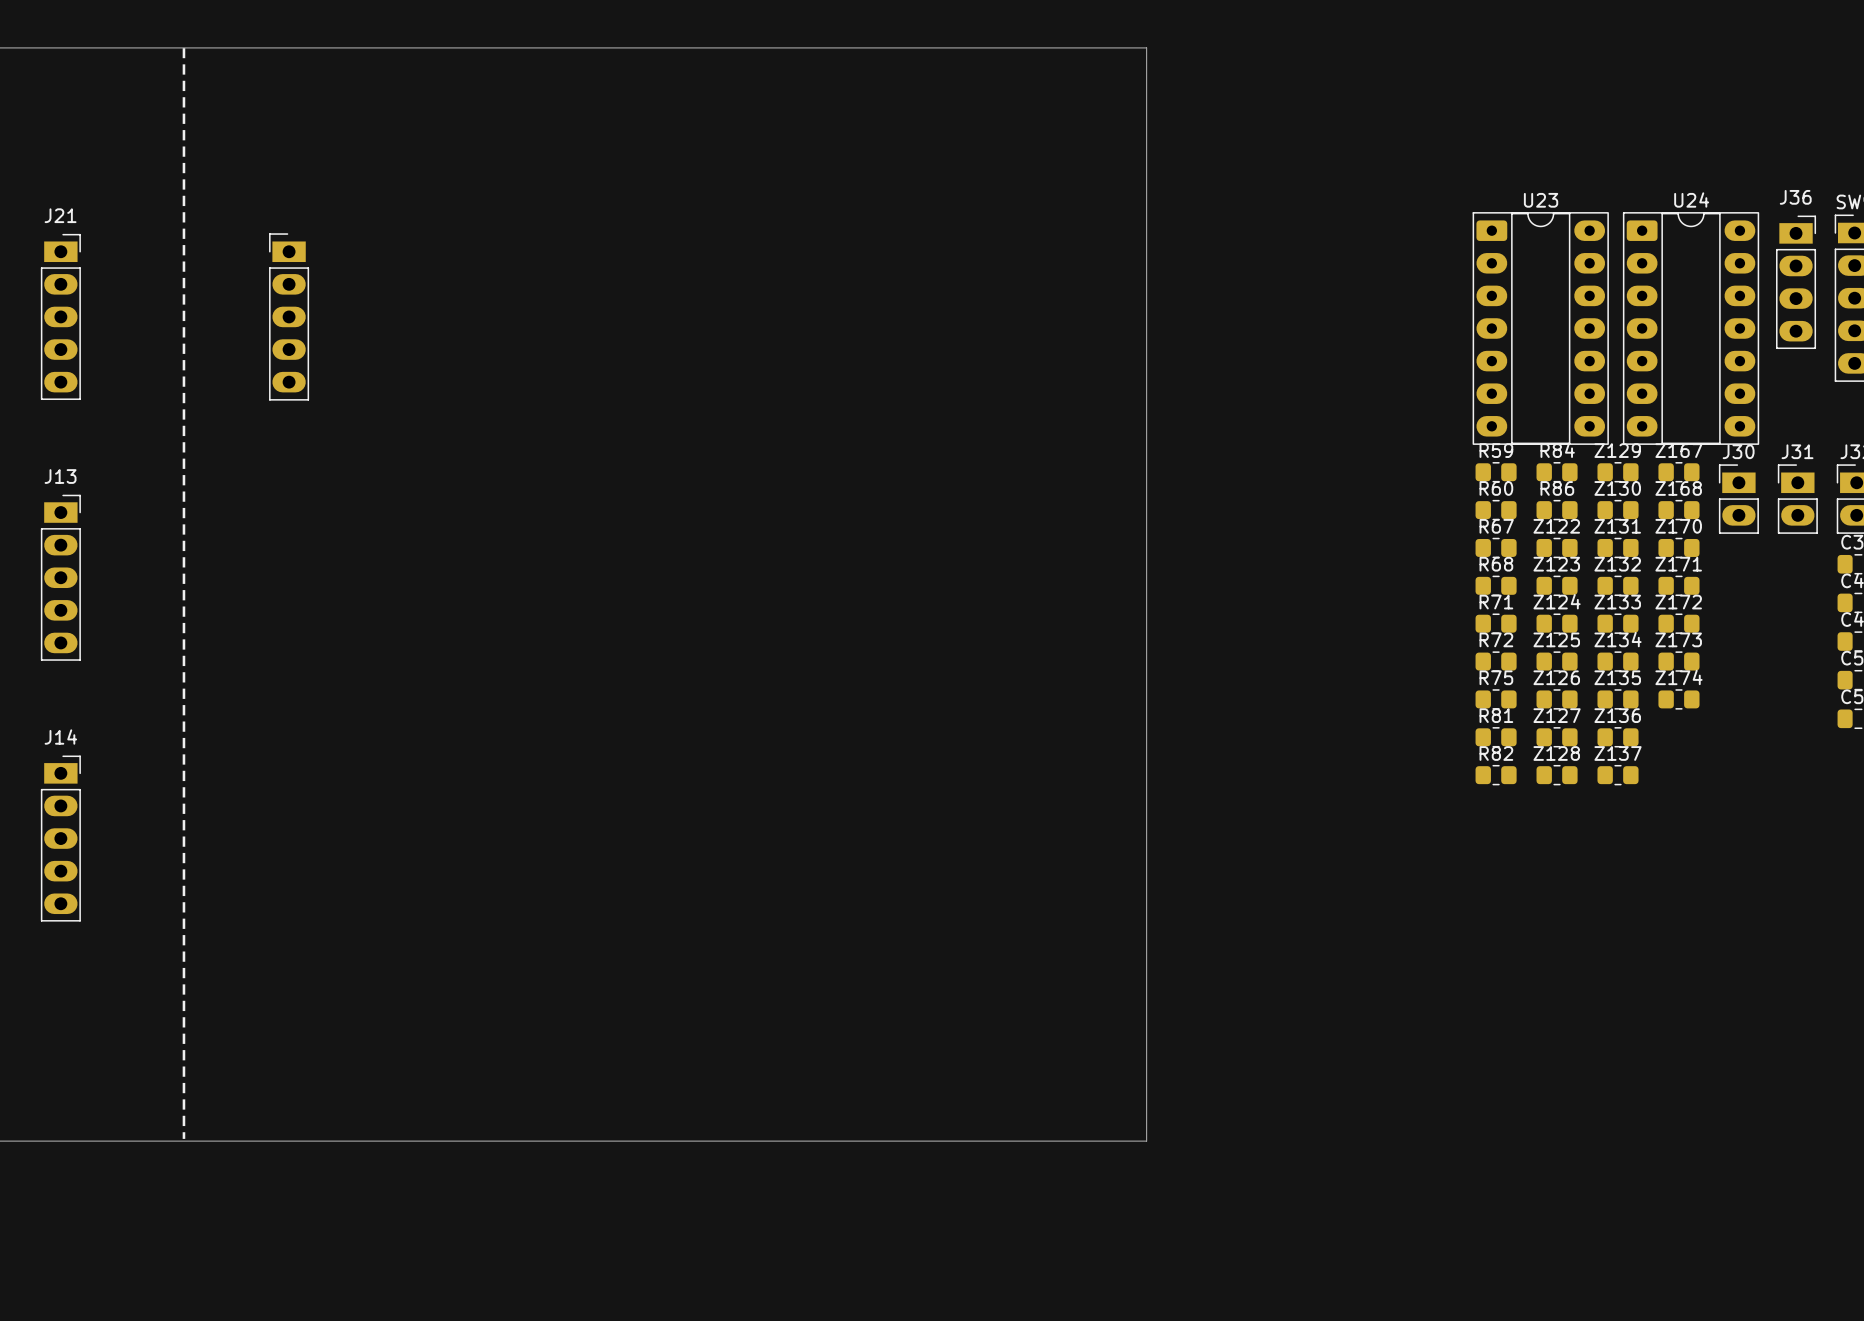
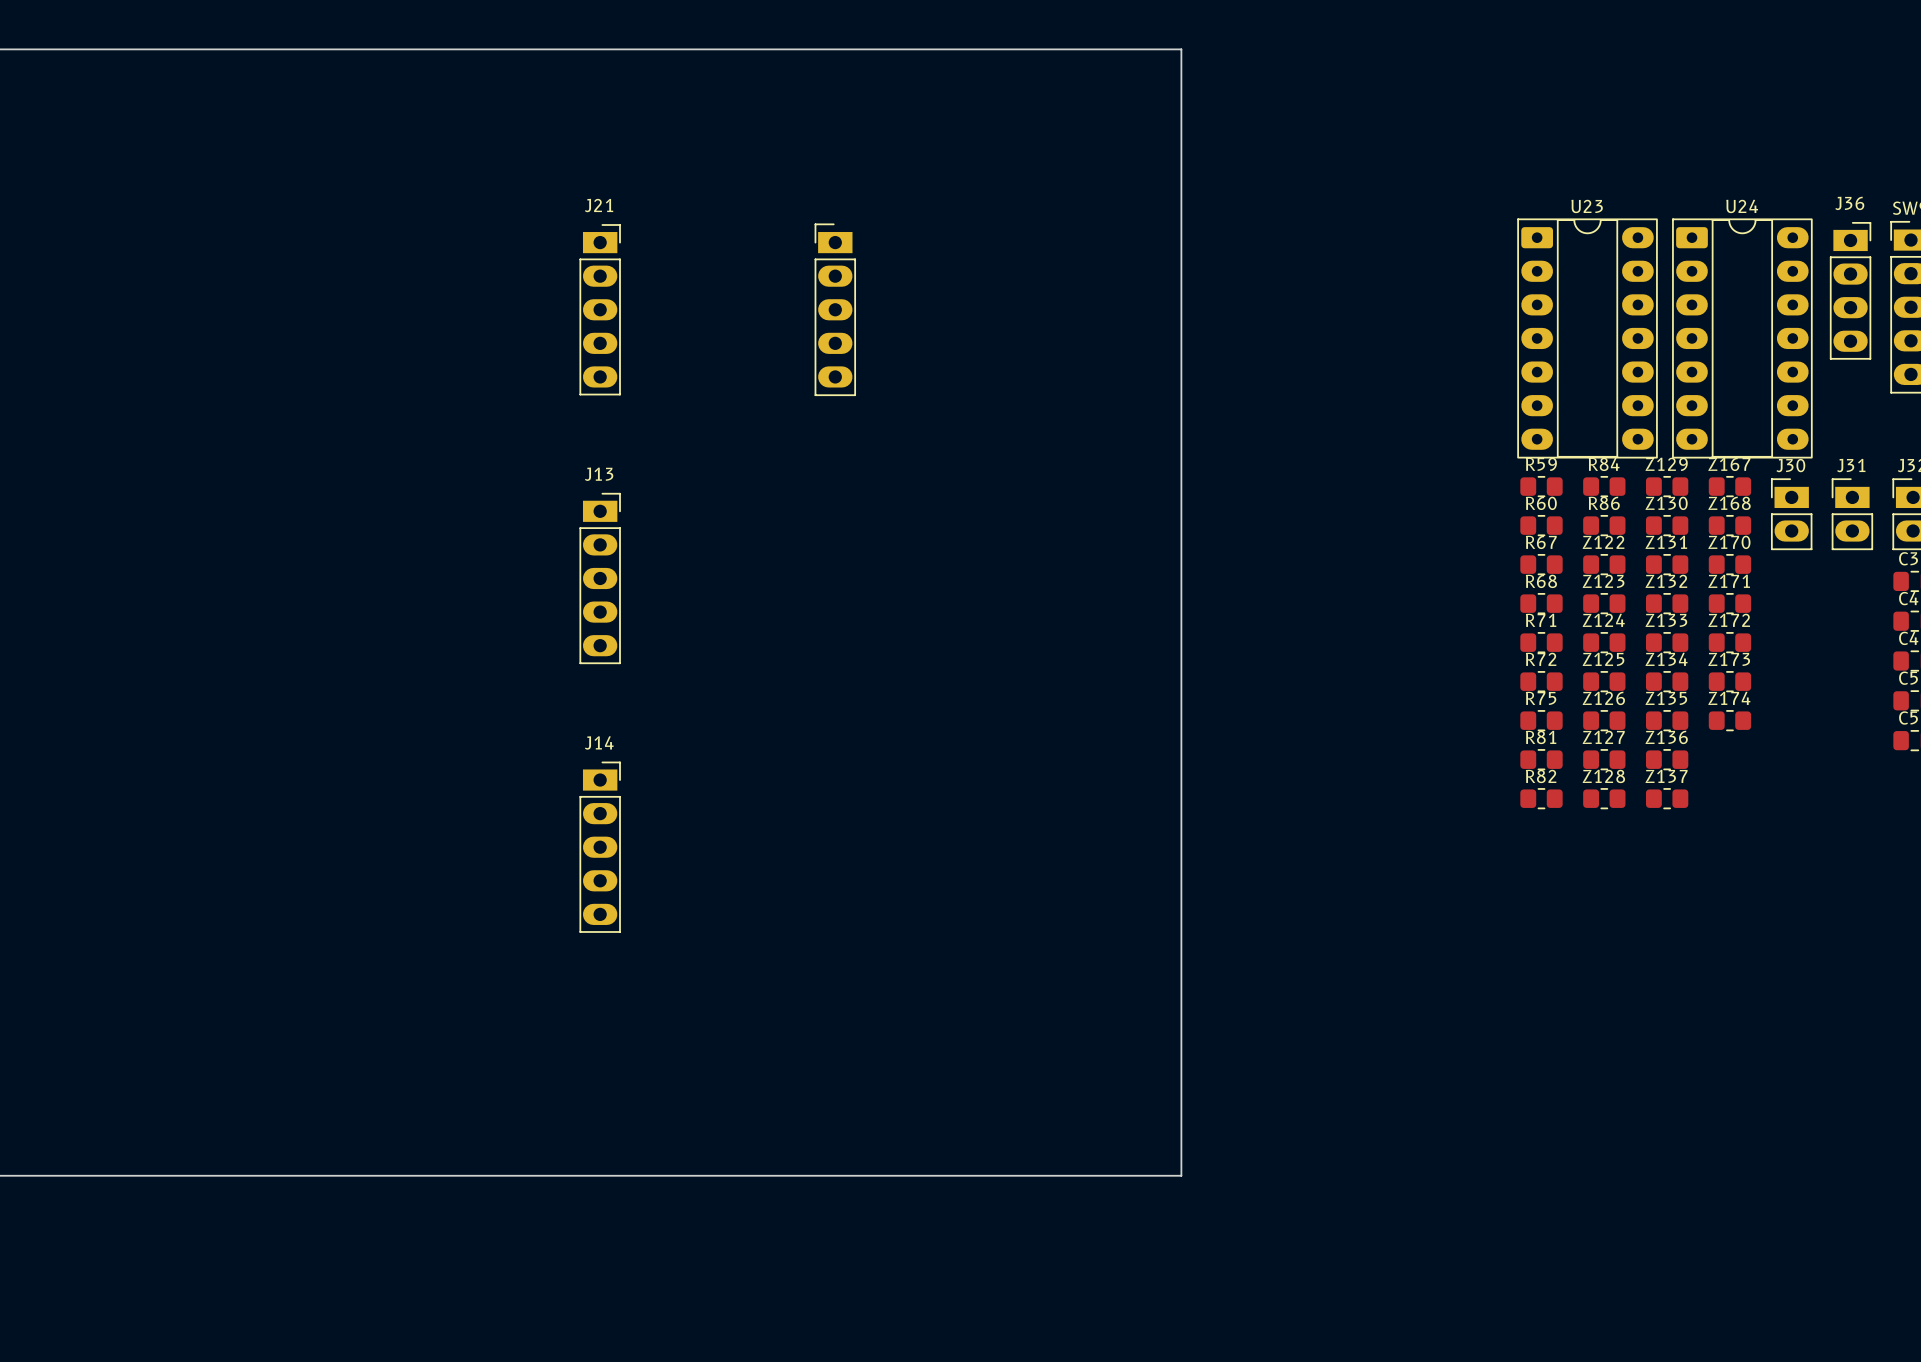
line: (183, 47) (183, 1138) -> none
J21 position: (174, 316) -> (717, 309)
J13 position: (60, 577) -> (600, 578)
J14 position: (60, 838) -> (600, 847)

